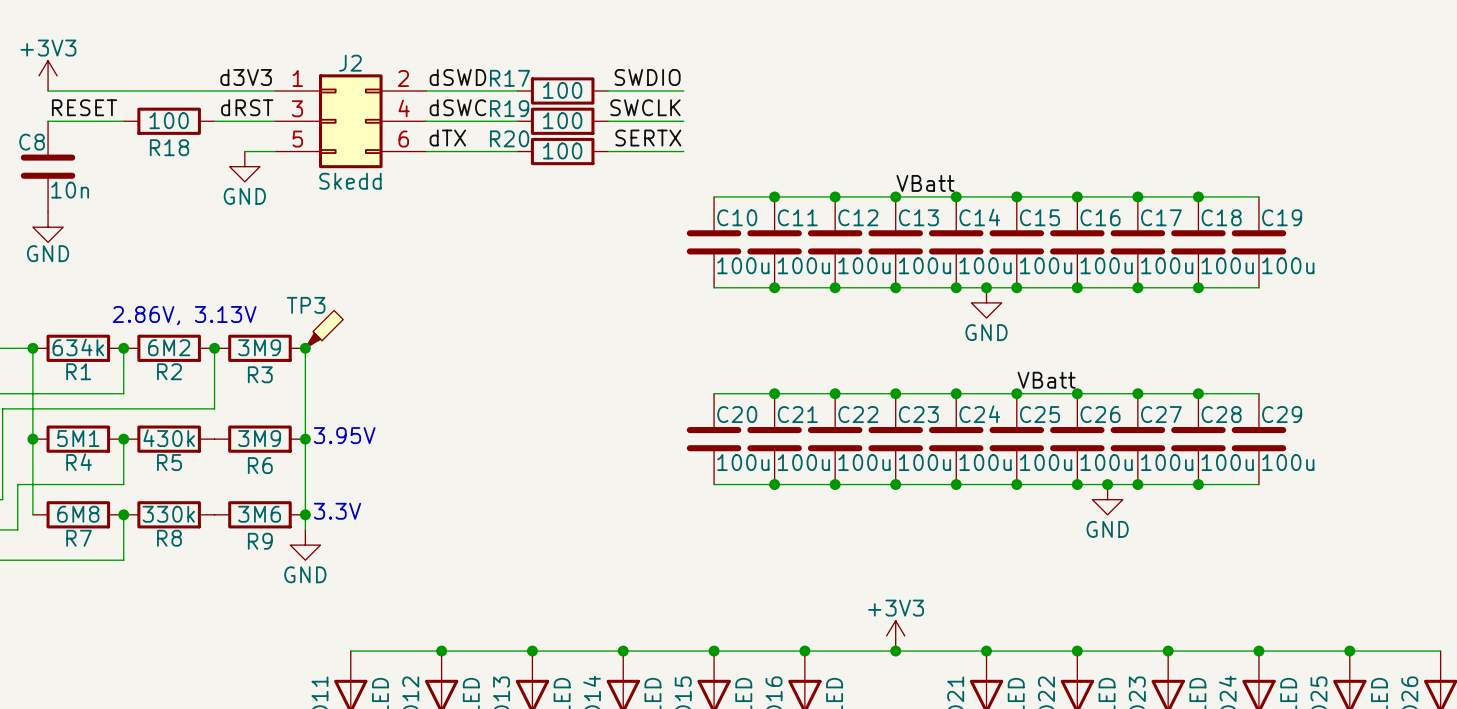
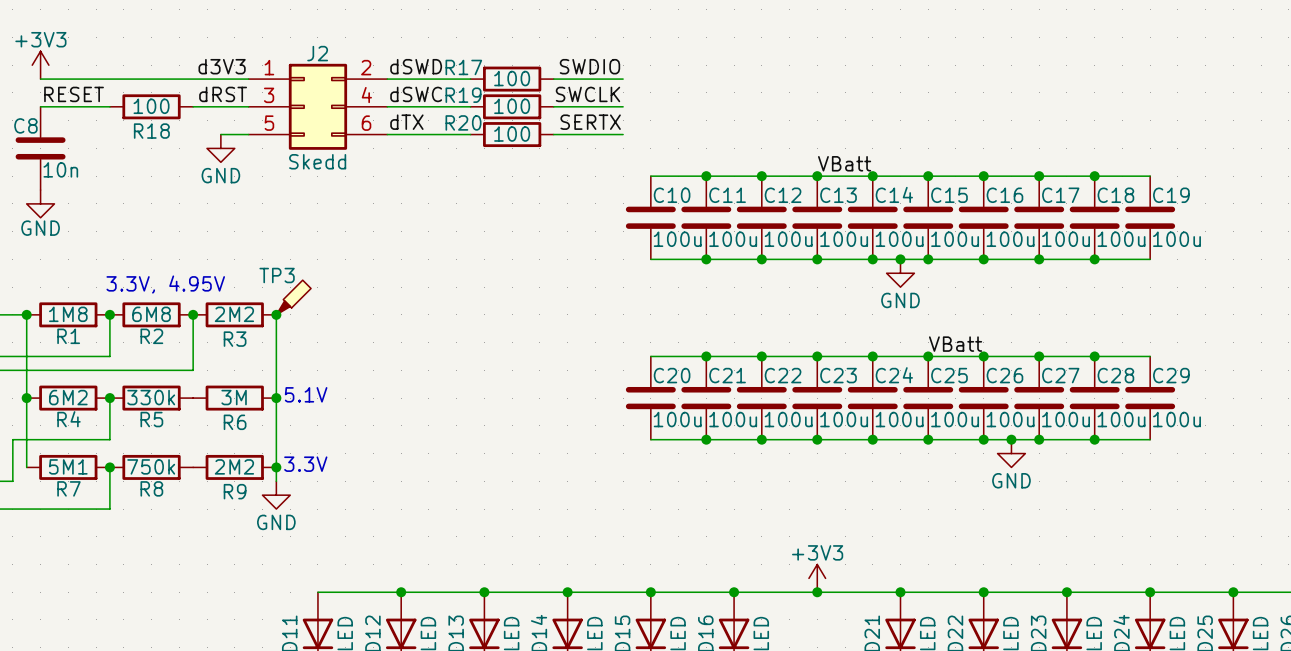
text: 2.86V, 3.13V (184, 315) -> 3.3V, 4.95V (165, 284)
R1 value: 634k (78, 347) -> 1M8 (68, 314)
R2 value: 6M2 (169, 347) -> 6M8 (151, 314)
R3 value: 3M9 (259, 347) -> 2M2 (234, 314)
text: 3.95V (344, 435) -> 5.1V (306, 394)
R4 value: 5M1 (78, 438) -> 6M2 (68, 397)
R5 value: 430k (169, 438) -> 330k (151, 397)
R6 value: 3M9 (259, 438) -> 3M (234, 397)
R7 value: 6M8 (78, 514) -> 5M1 (68, 466)
R8 value: 330k (168, 514) -> 750k (151, 466)
R9 value: 3M6 (259, 514) -> 2M2 (234, 466)

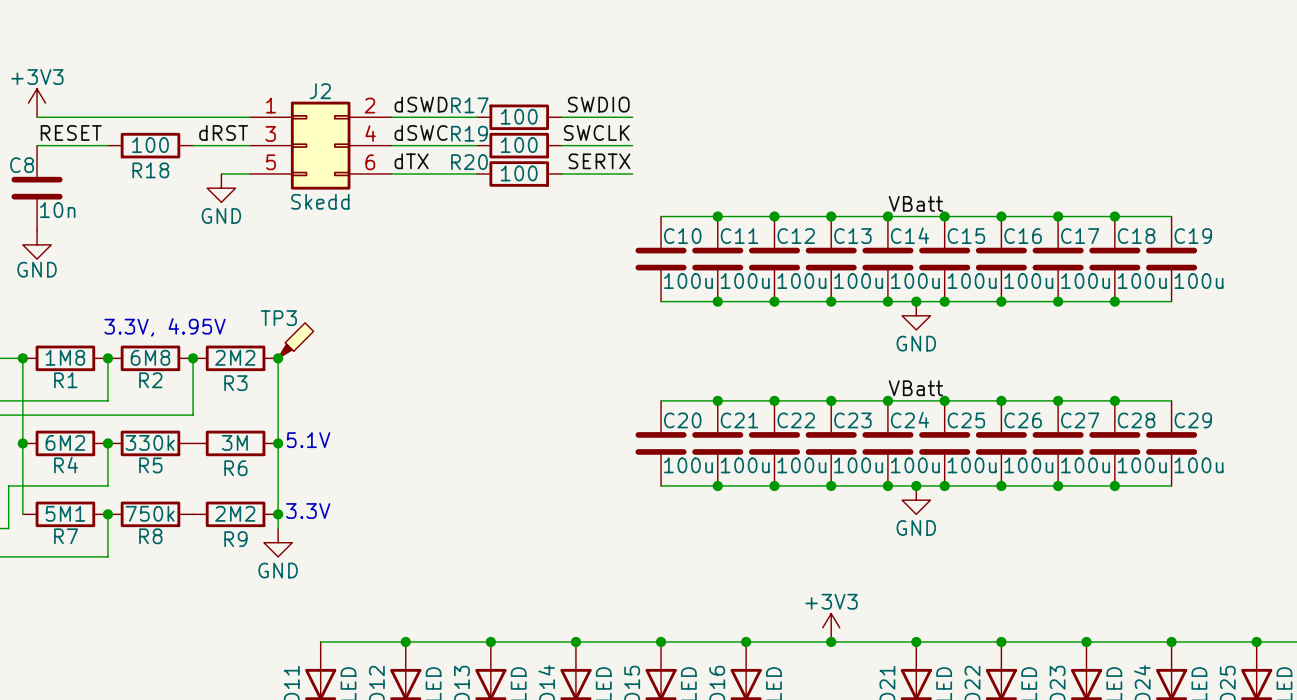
label: d3V3 (222, 66) -> none
label position: VBatt (844, 163) -> VBatt (915, 203)
label position: VBatt (955, 344) -> VBatt (915, 388)
junction: none -> (916, 485)
junction: (1011, 439) -> none
power symbol position: GND (1011, 453) -> GND (916, 500)

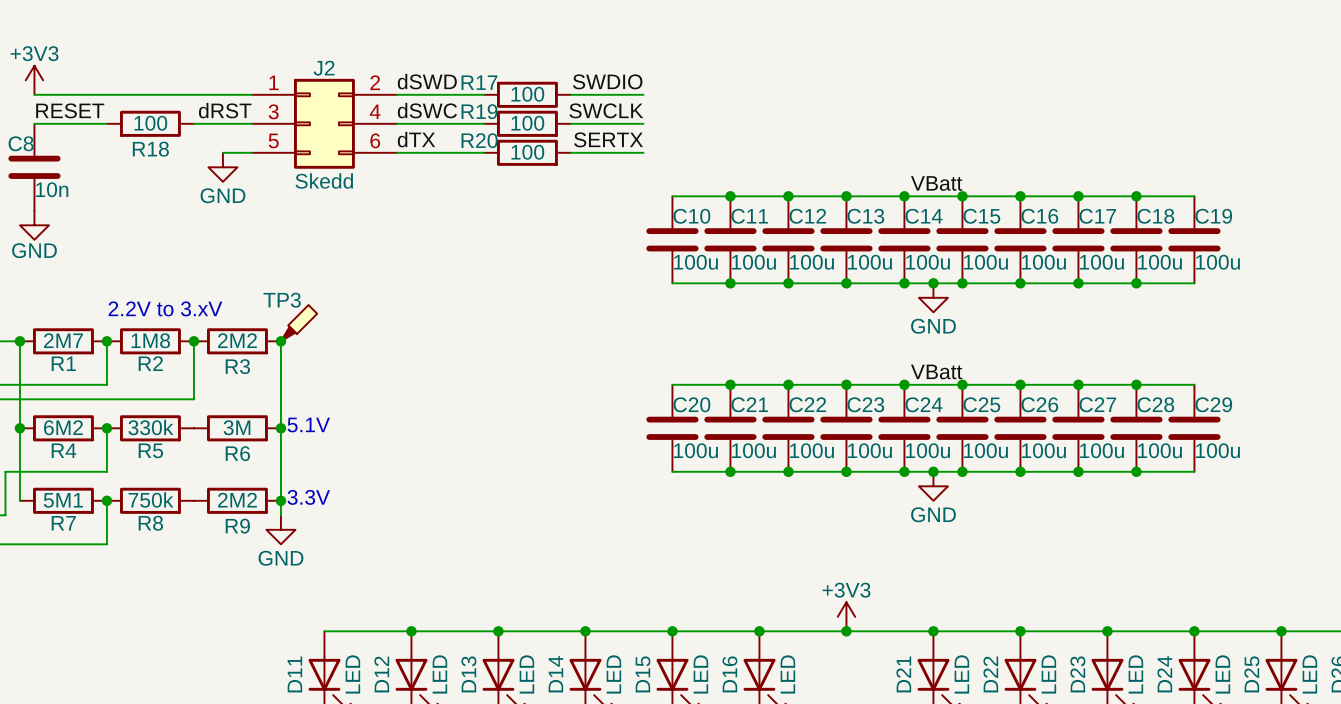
text: 3.3V, 4.95V (165, 327) -> 2.2V to 3.xV (165, 308)
R1 value: 1M8 (65, 357) -> 2M7 (63, 340)
R2 value: 6M8 (150, 357) -> 1M8 (150, 340)

